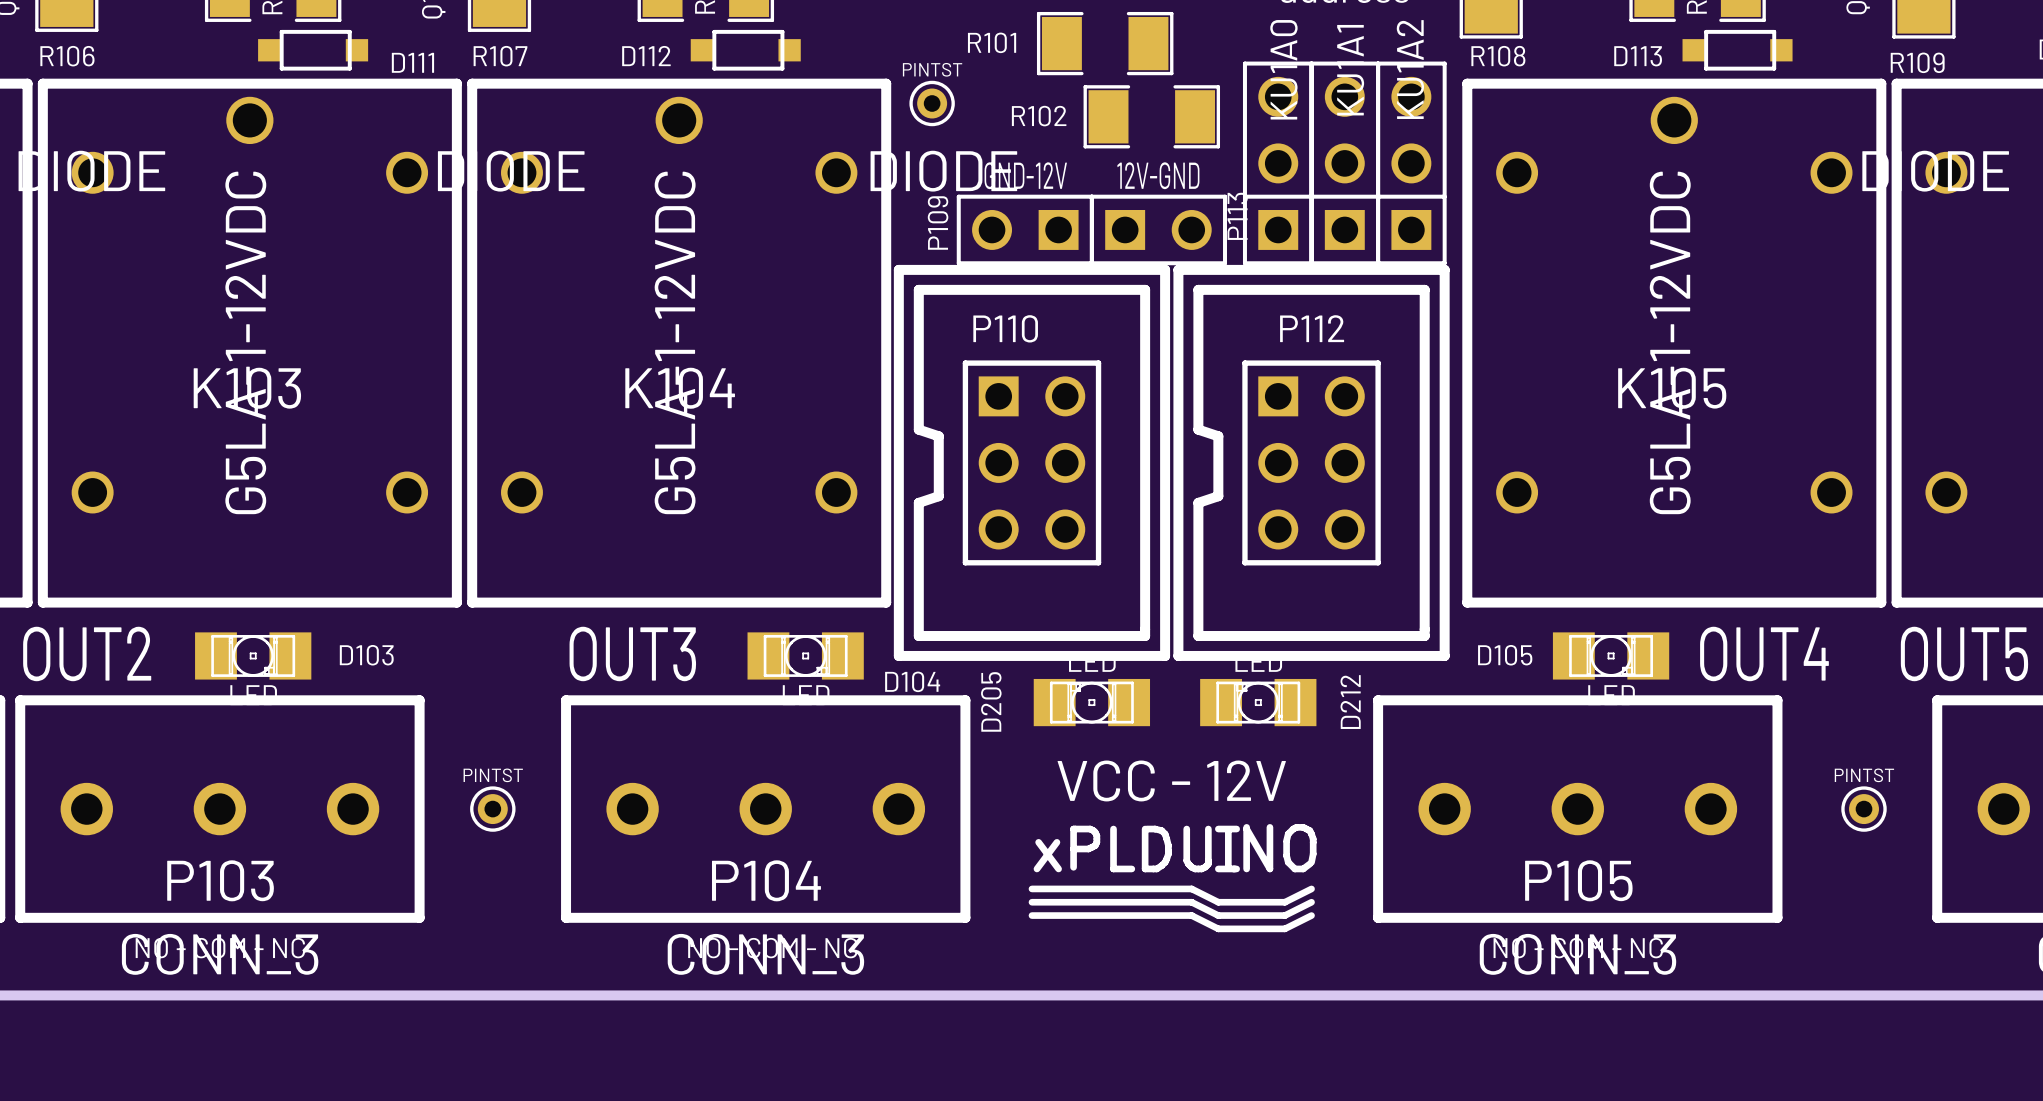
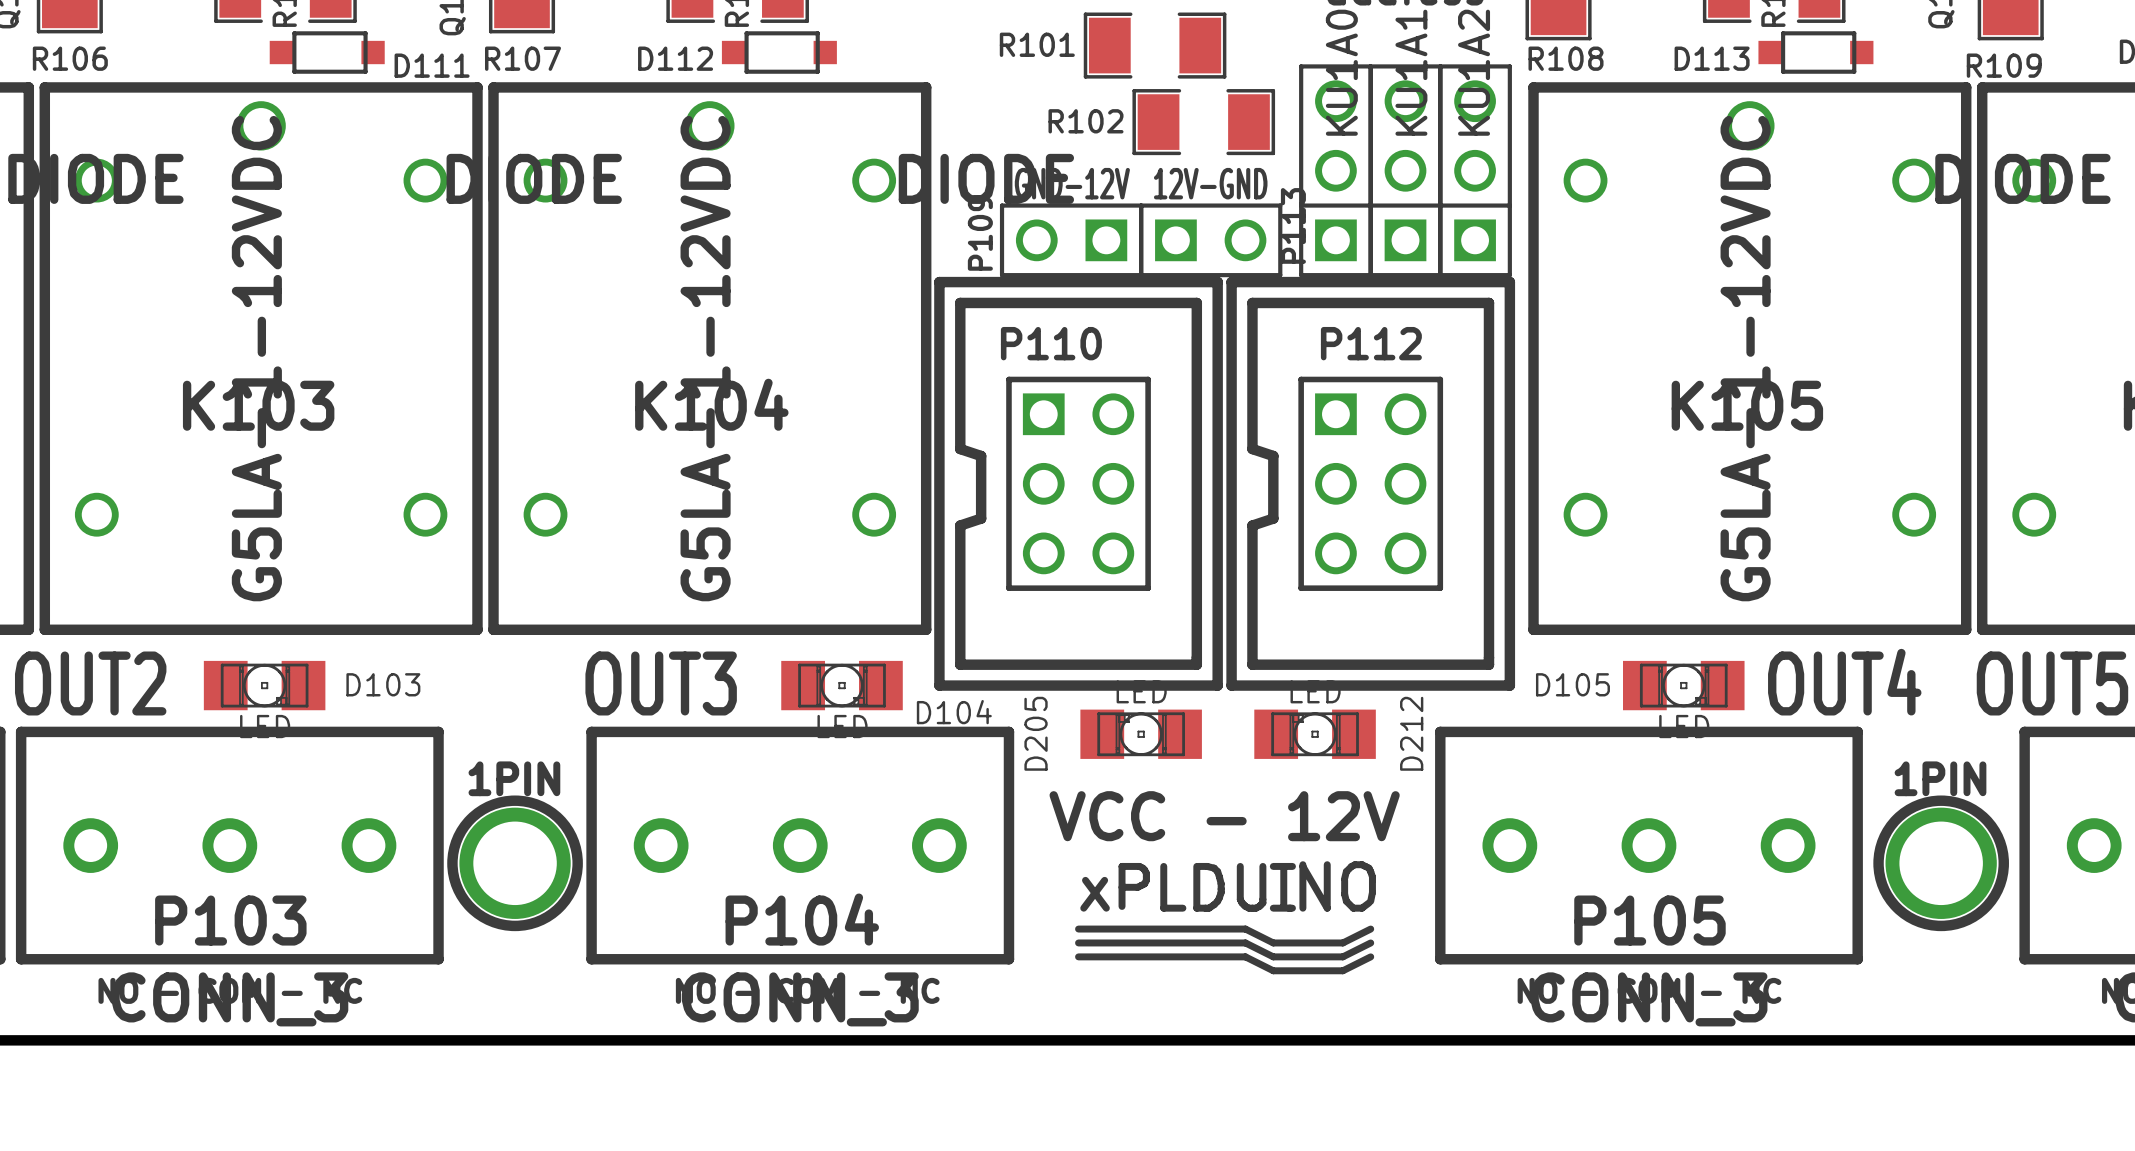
PINTST: (932, 103) -> none
PINTST: (492, 809) -> none
PINTST: (1864, 809) -> none
1PIN: none -> (515, 863)
1PIN: none -> (1941, 863)

